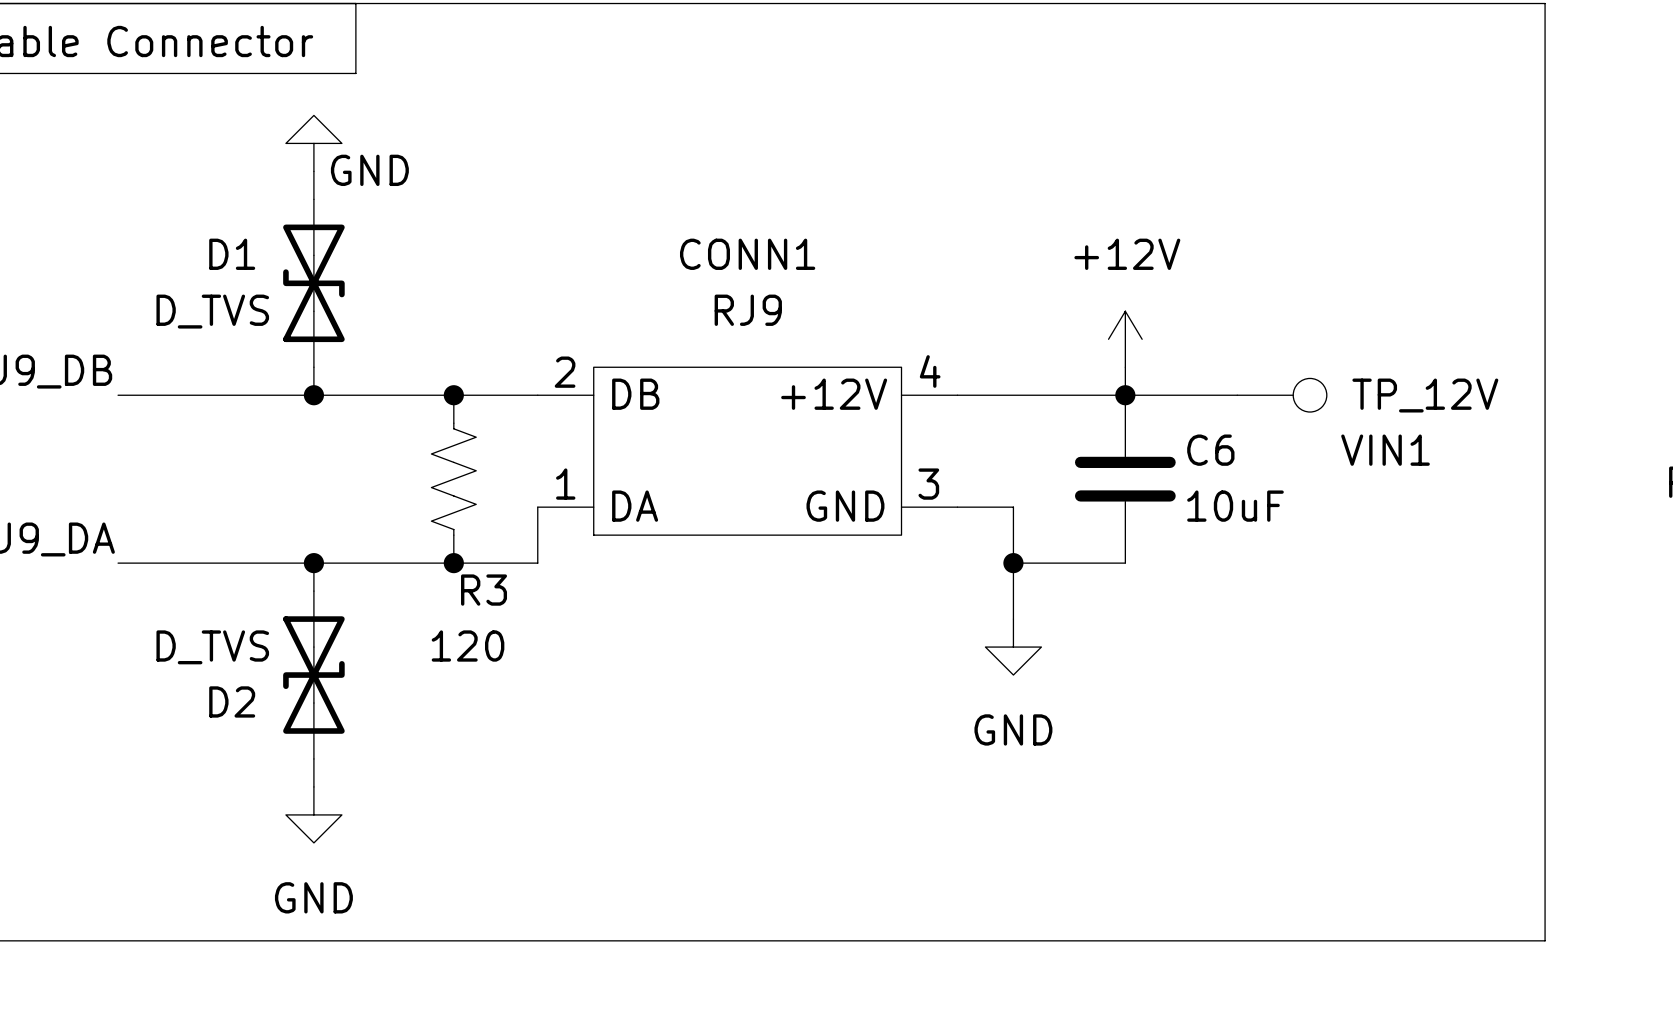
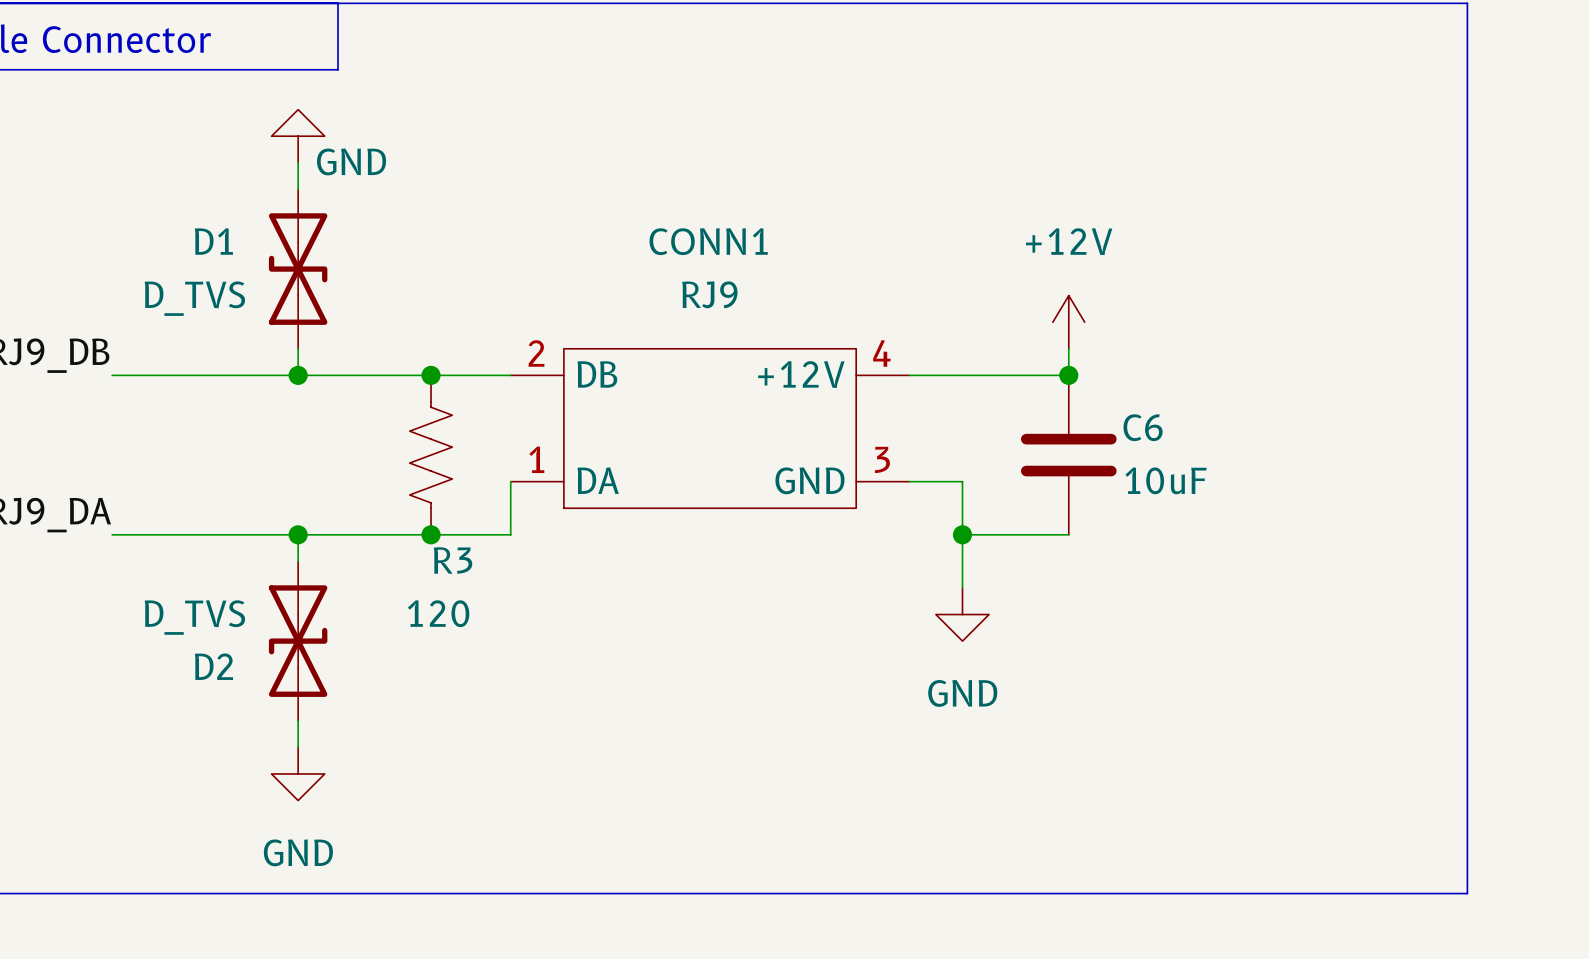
wire: (1125, 395) (1237, 395) -> none
VIN1: TP_12V (1282, 395) -> none

